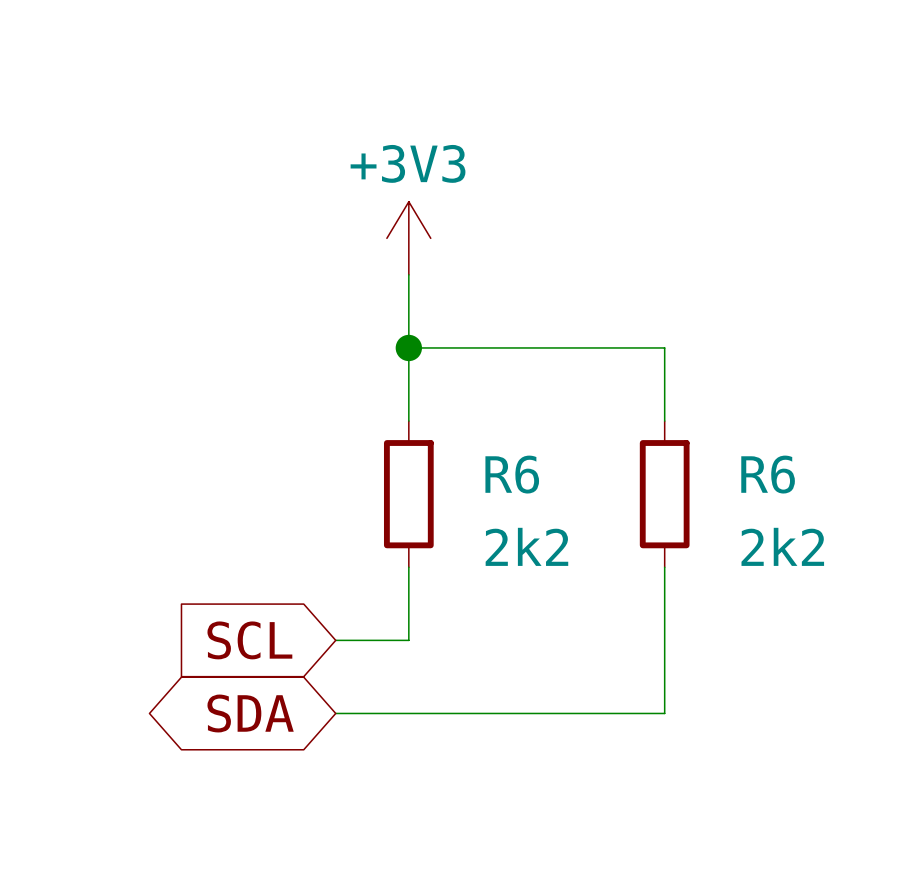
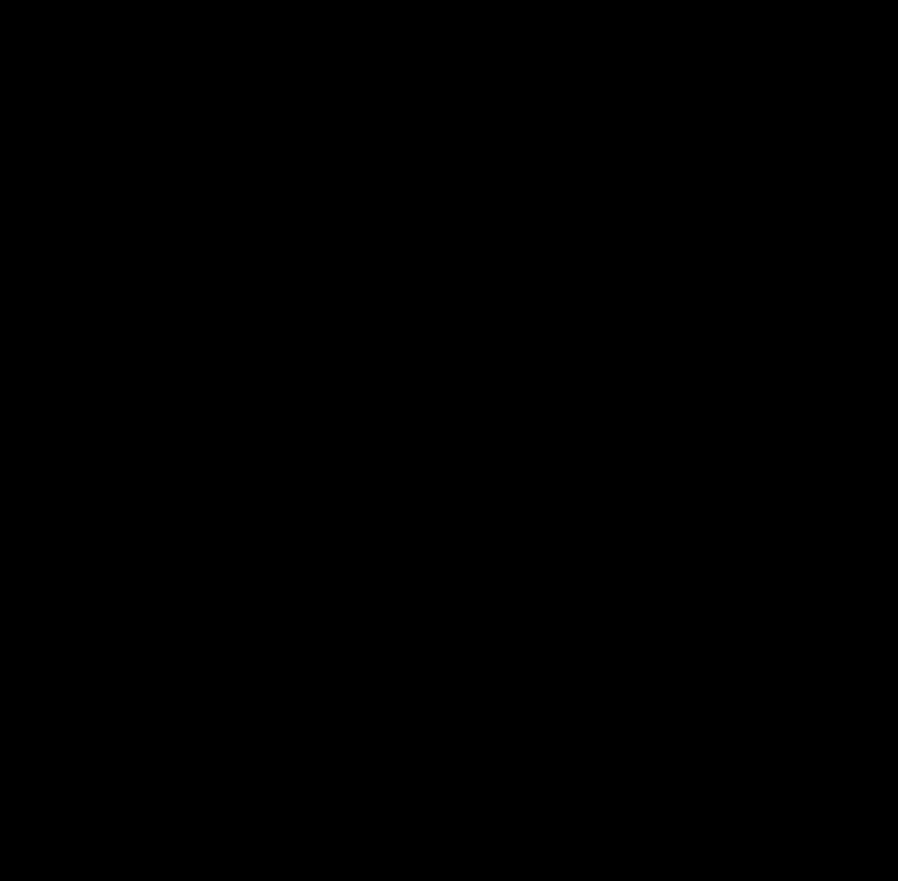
power symbol: +3V3 (408, 238) -> none
wire: (408, 274) (408, 421) -> none
wire: (408, 347) (664, 347) (664, 421) -> none
junction: (408, 347) -> none
R6: 2k2 (408, 494) -> none
R6: 2k2 (664, 494) -> none
wire: (408, 567) (408, 640) (335, 640) -> none
wire: (664, 567) (664, 713) (335, 713) -> none
global label: SCL (249, 640) -> none
global label: SDA (250, 713) -> none

